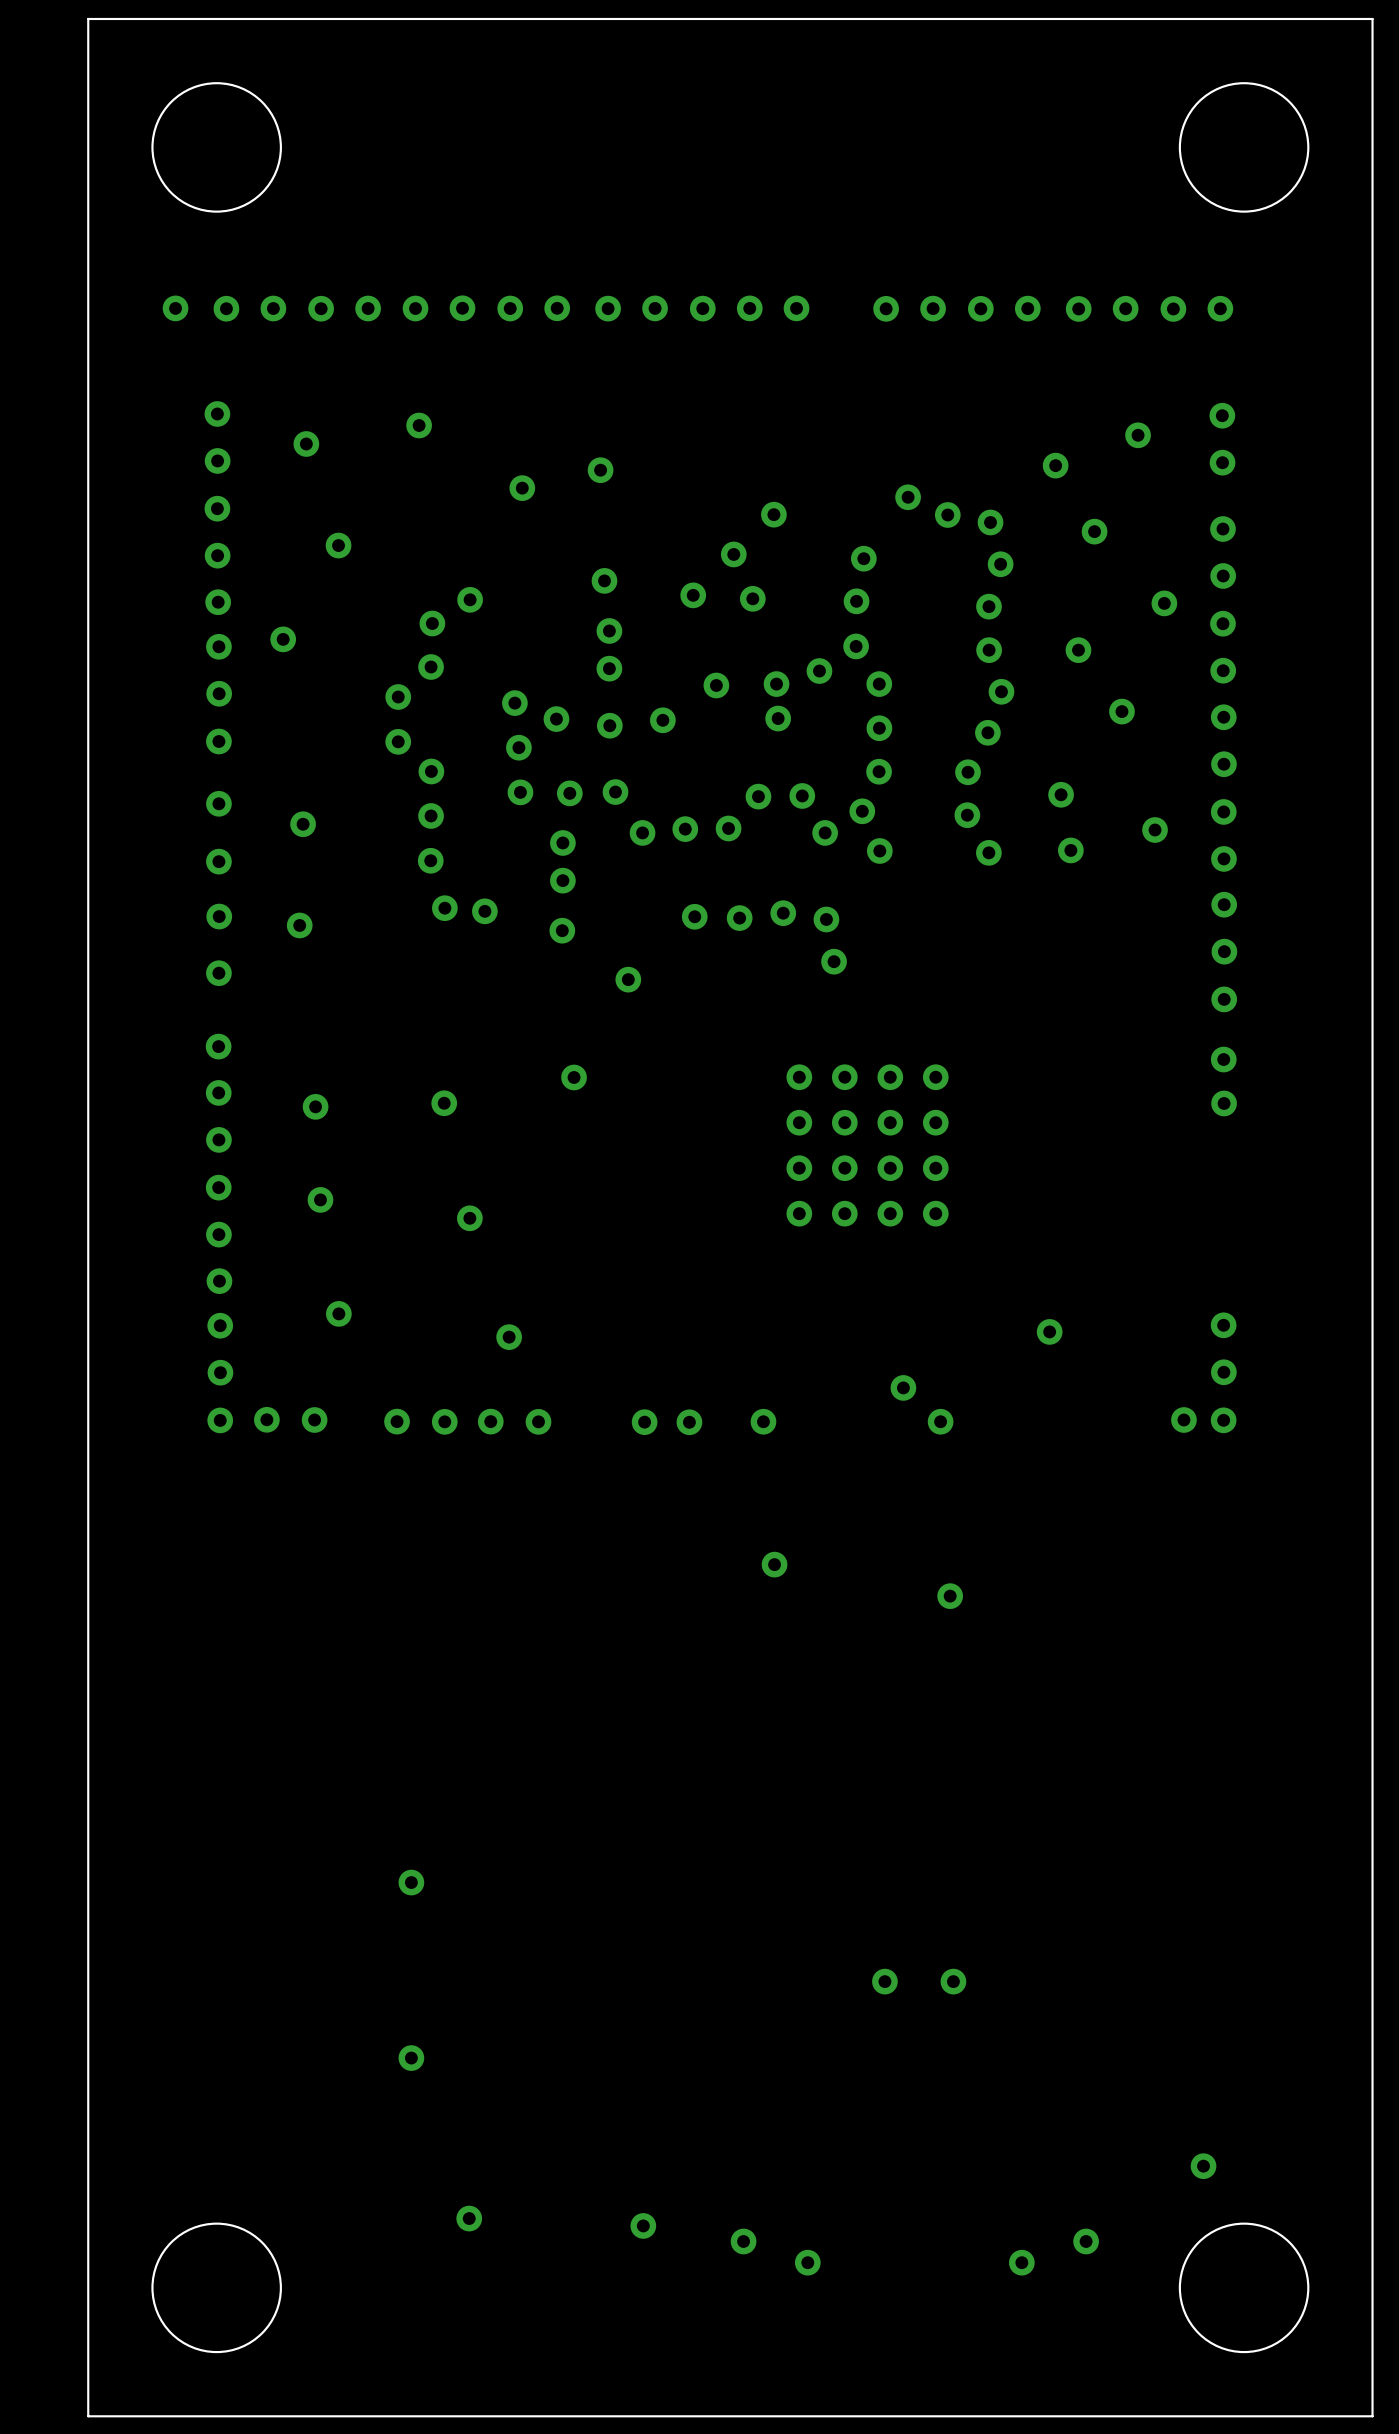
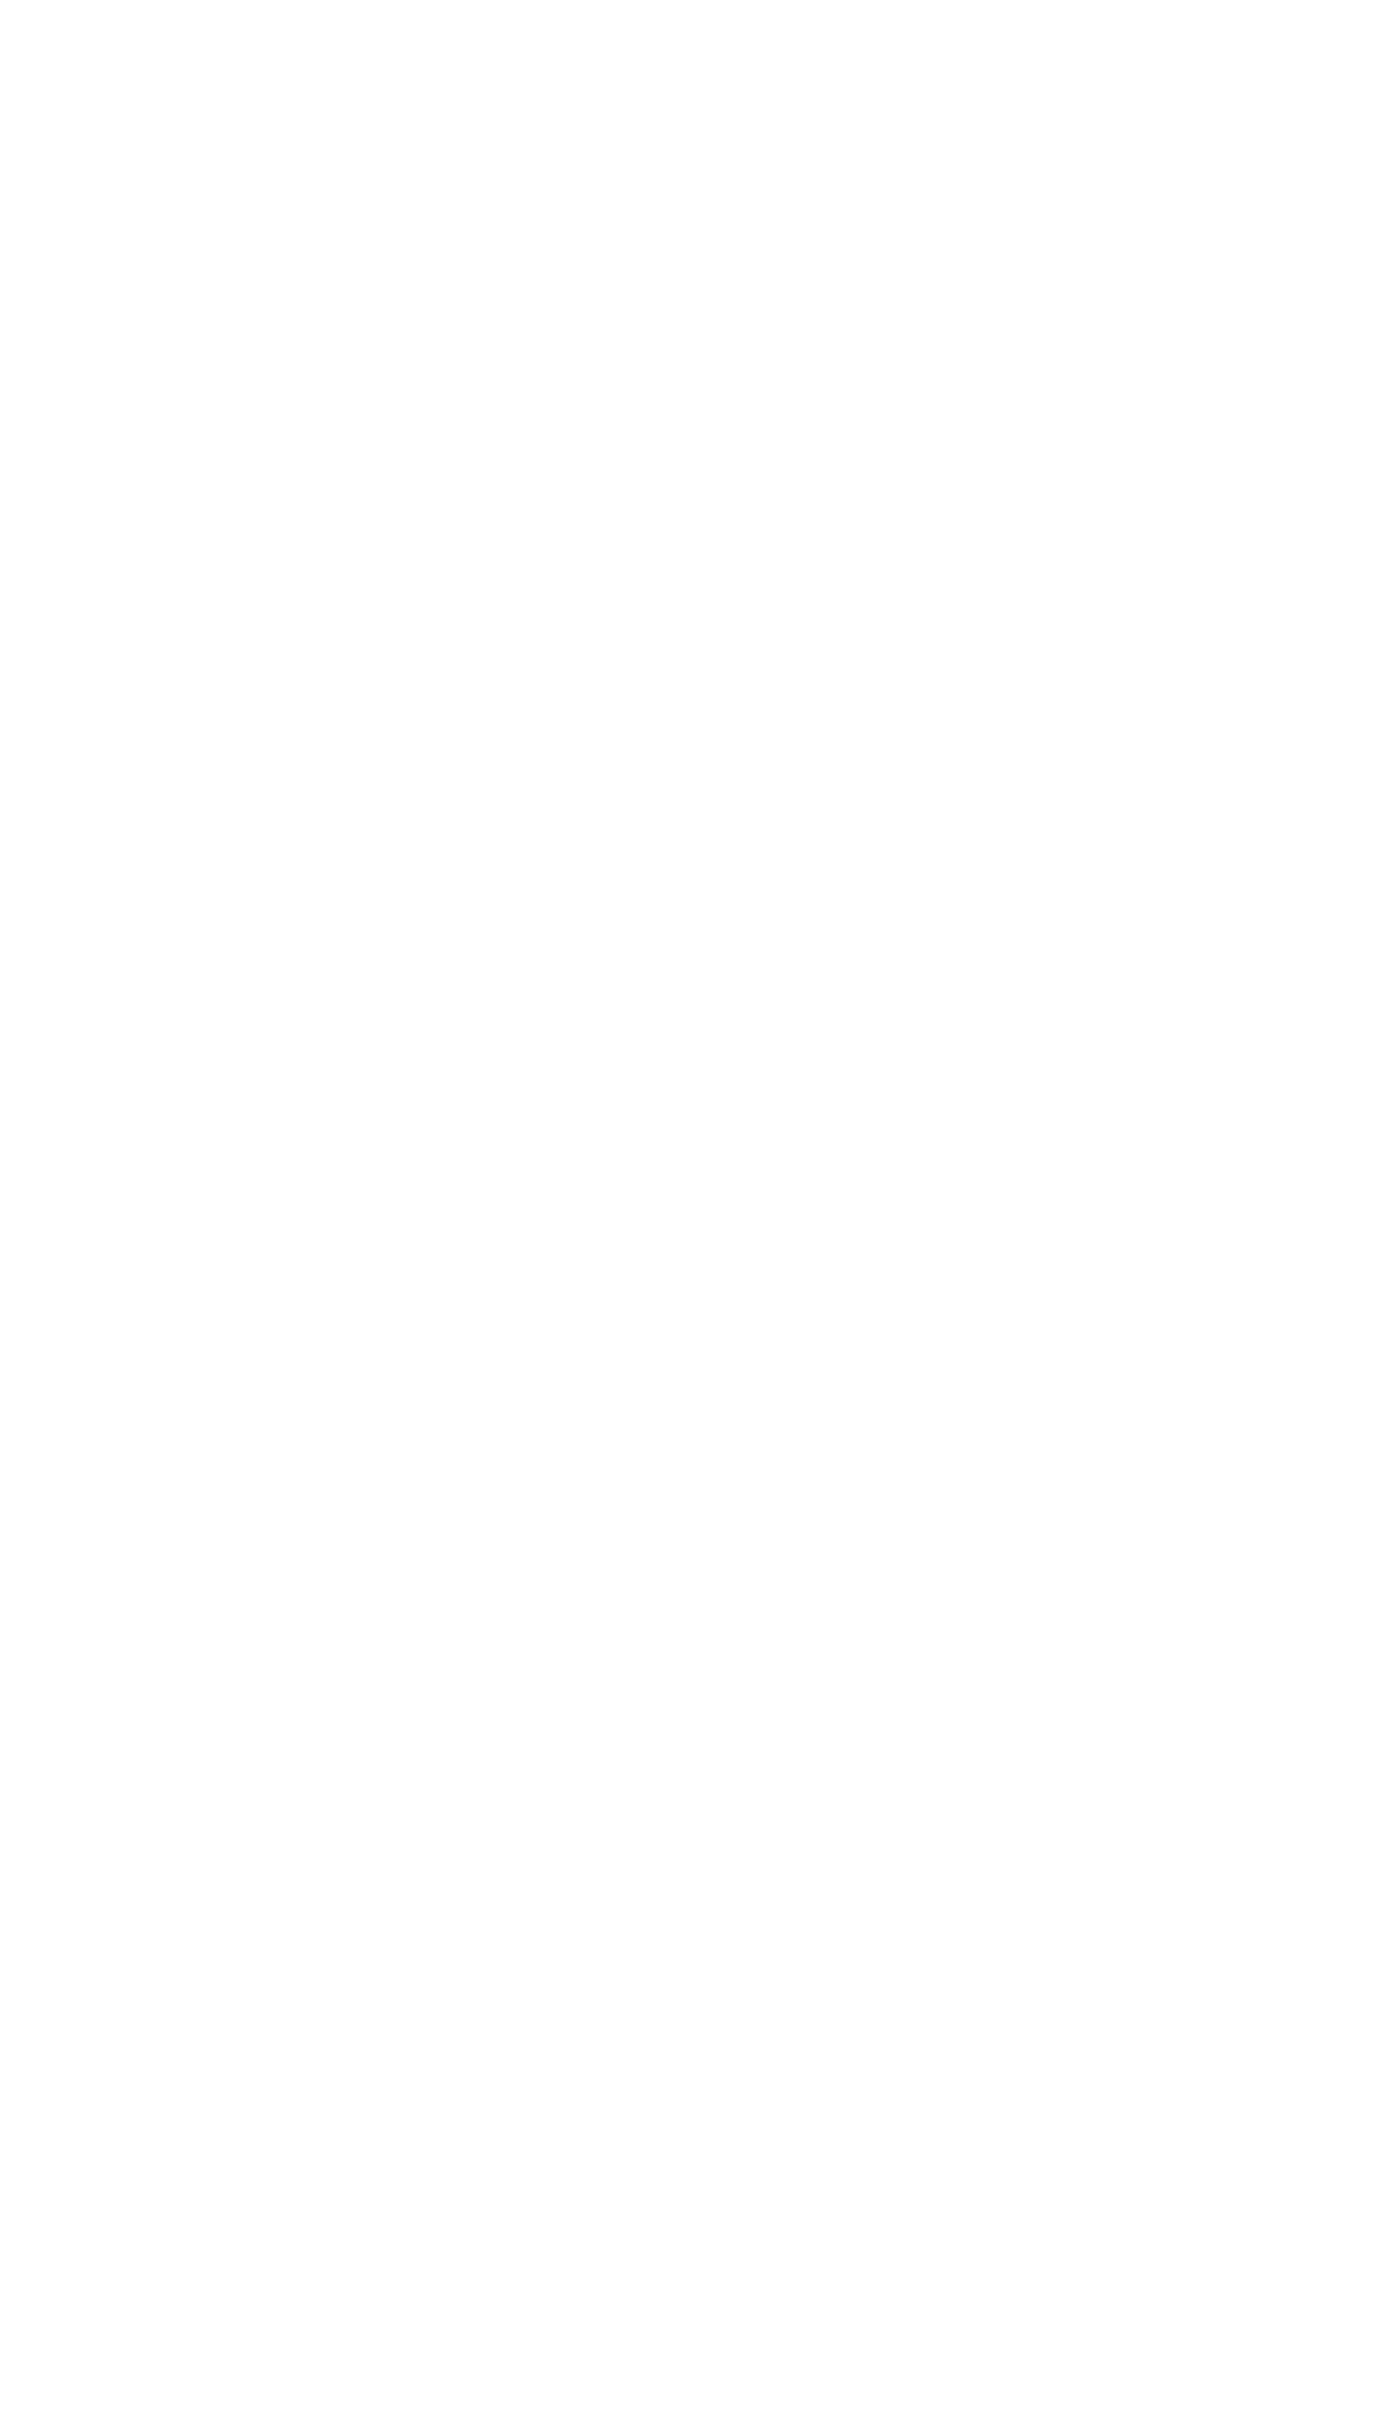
board edge: (1372, 18) (88, 18) (88, 2416) (1372, 2416) (1372, 18) -> none
round board edge: [151, 82, 282, 213] -> none
round board edge: [1178, 82, 1310, 213] -> none
part: (175, 308) -> none
part: (226, 308) -> none
part: (273, 308) -> none
part: (321, 308) -> none
part: (368, 308) -> none
part: (415, 308) -> none
part: (462, 308) -> none
part: (510, 308) -> none
part: (557, 308) -> none
part: (608, 308) -> none
part: (655, 308) -> none
part: (702, 308) -> none
part: (749, 308) -> none
part: (796, 308) -> none
part: (886, 308) -> none
part: (933, 308) -> none
part: (980, 308) -> none
part: (1027, 308) -> none
part: (1078, 308) -> none
part: (1125, 308) -> none
part: (1173, 308) -> none
part: (1220, 308) -> none
part: (217, 413) -> none
part: (1222, 415) -> none
part: (419, 425) -> none
part: (1138, 435) -> none
part: (306, 443) -> none
part: (217, 460) -> none
part: (1222, 462) -> none
part: (1055, 465) -> none
part: (600, 470) -> none
part: (522, 488) -> none
part: (908, 497) -> none
part: (217, 508) -> none
part: (773, 514) -> none
part: (947, 514) -> none
part: (990, 522) -> none
part: (1222, 529) -> none
part: (1094, 531) -> none
part: (338, 545) -> none
part: (733, 554) -> none
part: (217, 555) -> none
part: (863, 558) -> none
part: (1000, 564) -> none
part: (1223, 575) -> none
part: (604, 580) -> none
part: (693, 595) -> none
part: (752, 598) -> none
part: (470, 599) -> none
part: (856, 601) -> none
part: (218, 602) -> none
part: (1164, 603) -> none
part: (988, 606) -> none
part: (432, 623) -> none
part: (1222, 623) -> none
part: (609, 630) -> none
part: (283, 639) -> none
part: (218, 646) -> none
part: (856, 646) -> none
part: (989, 650) -> none
part: (1078, 650) -> none
part: (431, 667) -> none
part: (609, 668) -> none
part: (1223, 670) -> none
part: (819, 671) -> none
part: (776, 684) -> none
part: (879, 684) -> none
part: (716, 685) -> none
part: (1001, 691) -> none
part: (219, 693) -> none
part: (398, 697) -> none
part: (514, 703) -> none
part: (1121, 711) -> none
part: (1223, 717) -> none
part: (778, 718) -> none
part: (556, 719) -> none
part: (662, 720) -> none
part: (609, 725) -> none
part: (879, 728) -> none
part: (987, 732) -> none
part: (218, 741) -> none
part: (398, 741) -> none
part: (518, 747) -> none
part: (1223, 764) -> none
part: (431, 771) -> none
part: (879, 771) -> none
part: (968, 772) -> none
part: (520, 792) -> none
part: (615, 792) -> none
part: (569, 793) -> none
part: (1061, 794) -> none
part: (802, 795) -> none
part: (758, 796) -> none
part: (218, 803) -> none
part: (862, 811) -> none
part: (1223, 811) -> none
part: (431, 815) -> none
part: (967, 815) -> none
part: (303, 824) -> none
part: (728, 828) -> none
part: (685, 829) -> none
part: (1155, 830) -> none
part: (642, 832) -> none
part: (825, 832) -> none
part: (562, 842) -> none
part: (879, 850) -> none
part: (1070, 850) -> none
part: (988, 852) -> none
part: (1223, 858) -> none
part: (430, 860) -> none
part: (218, 861) -> none
part: (562, 880) -> none
part: (1224, 904) -> none
part: (444, 908) -> none
part: (484, 911) -> none
part: (783, 913) -> none
part: (219, 916) -> none
part: (694, 916) -> none
part: (739, 918) -> none
part: (826, 919) -> none
part: (299, 925) -> none
part: (562, 930) -> none
part: (1224, 951) -> none
part: (834, 961) -> none
part: (218, 973) -> none
part: (628, 979) -> none
part: (1224, 999) -> none
part: (218, 1046) -> none
part: (1223, 1059) -> none
part: (574, 1077) -> none
part: (799, 1077) -> none
part: (844, 1077) -> none
part: (890, 1077) -> none
part: (935, 1077) -> none
part: (218, 1092) -> none
part: (444, 1103) -> none
part: (1224, 1103) -> none
part: (315, 1106) -> none
part: (799, 1122) -> none
part: (844, 1122) -> none
part: (890, 1122) -> none
part: (935, 1122) -> none
part: (218, 1139) -> none
part: (799, 1168) -> none
part: (844, 1168) -> none
part: (890, 1168) -> none
part: (935, 1168) -> none
part: (218, 1187) -> none
part: (320, 1199) -> none
part: (799, 1213) -> none
part: (844, 1213) -> none
part: (890, 1213) -> none
part: (935, 1213) -> none
part: (469, 1218) -> none
part: (218, 1234) -> none
part: (219, 1281) -> none
part: (338, 1313) -> none
part: (220, 1325) -> none
part: (1223, 1325) -> none
part: (1049, 1331) -> none
part: (509, 1337) -> none
part: (220, 1372) -> none
part: (1223, 1372) -> none
part: (903, 1387) -> none
part: (266, 1419) -> none
part: (220, 1420) -> none
part: (314, 1420) -> none
part: (1183, 1420) -> none
part: (1223, 1420) -> none
part: (397, 1421) -> none
part: (444, 1421) -> none
part: (490, 1421) -> none
part: (538, 1421) -> none
part: (763, 1421) -> none
part: (940, 1421) -> none
part: (644, 1422) -> none
part: (689, 1422) -> none
part: (774, 1564) -> none
part: (950, 1596) -> none
part: (411, 1882) -> none
part: (884, 1981) -> none
part: (953, 1981) -> none
part: (411, 2058) -> none
part: (1203, 2166) -> none
part: (469, 2218) -> none
round board edge: [151, 2222, 282, 2354] -> none
round board edge: [1178, 2222, 1310, 2354] -> none
part: (643, 2225) -> none
part: (743, 2241) -> none
part: (1086, 2241) -> none
part: (807, 2262) -> none
part: (1021, 2262) -> none

